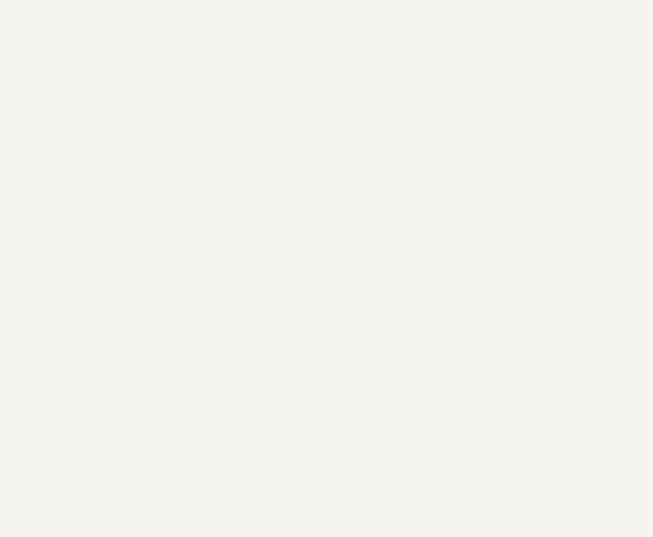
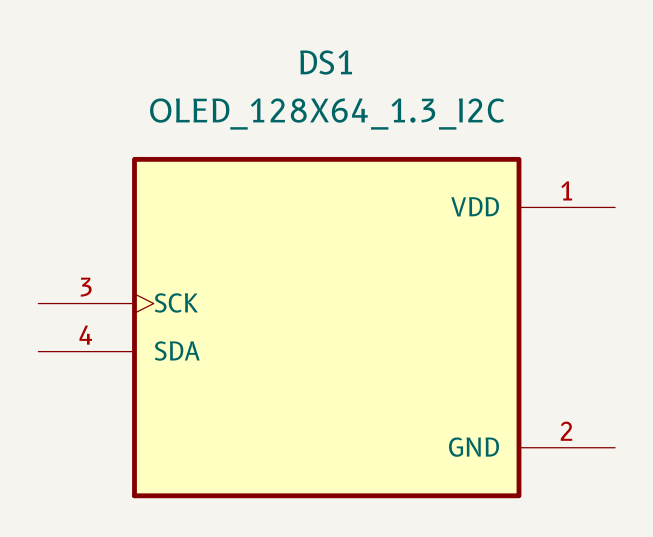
DS1: none -> OLED_128X64_1.3_I2C (326, 327)

